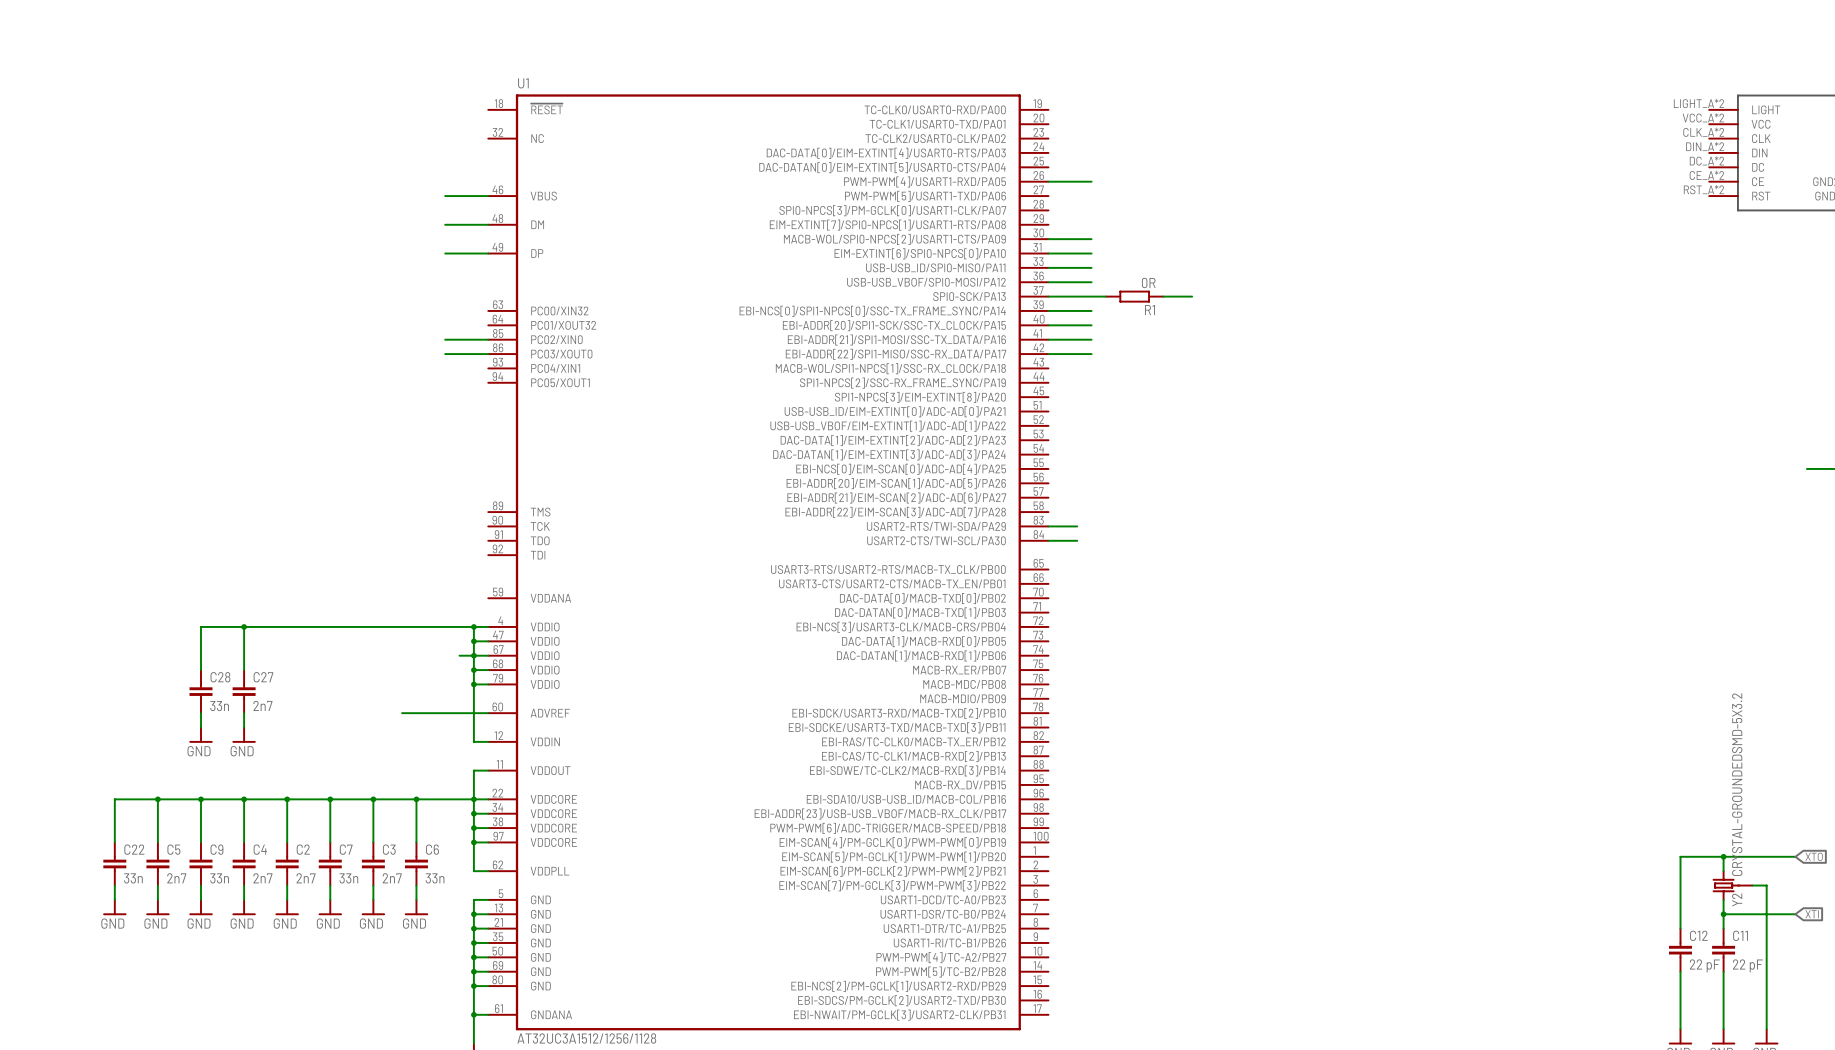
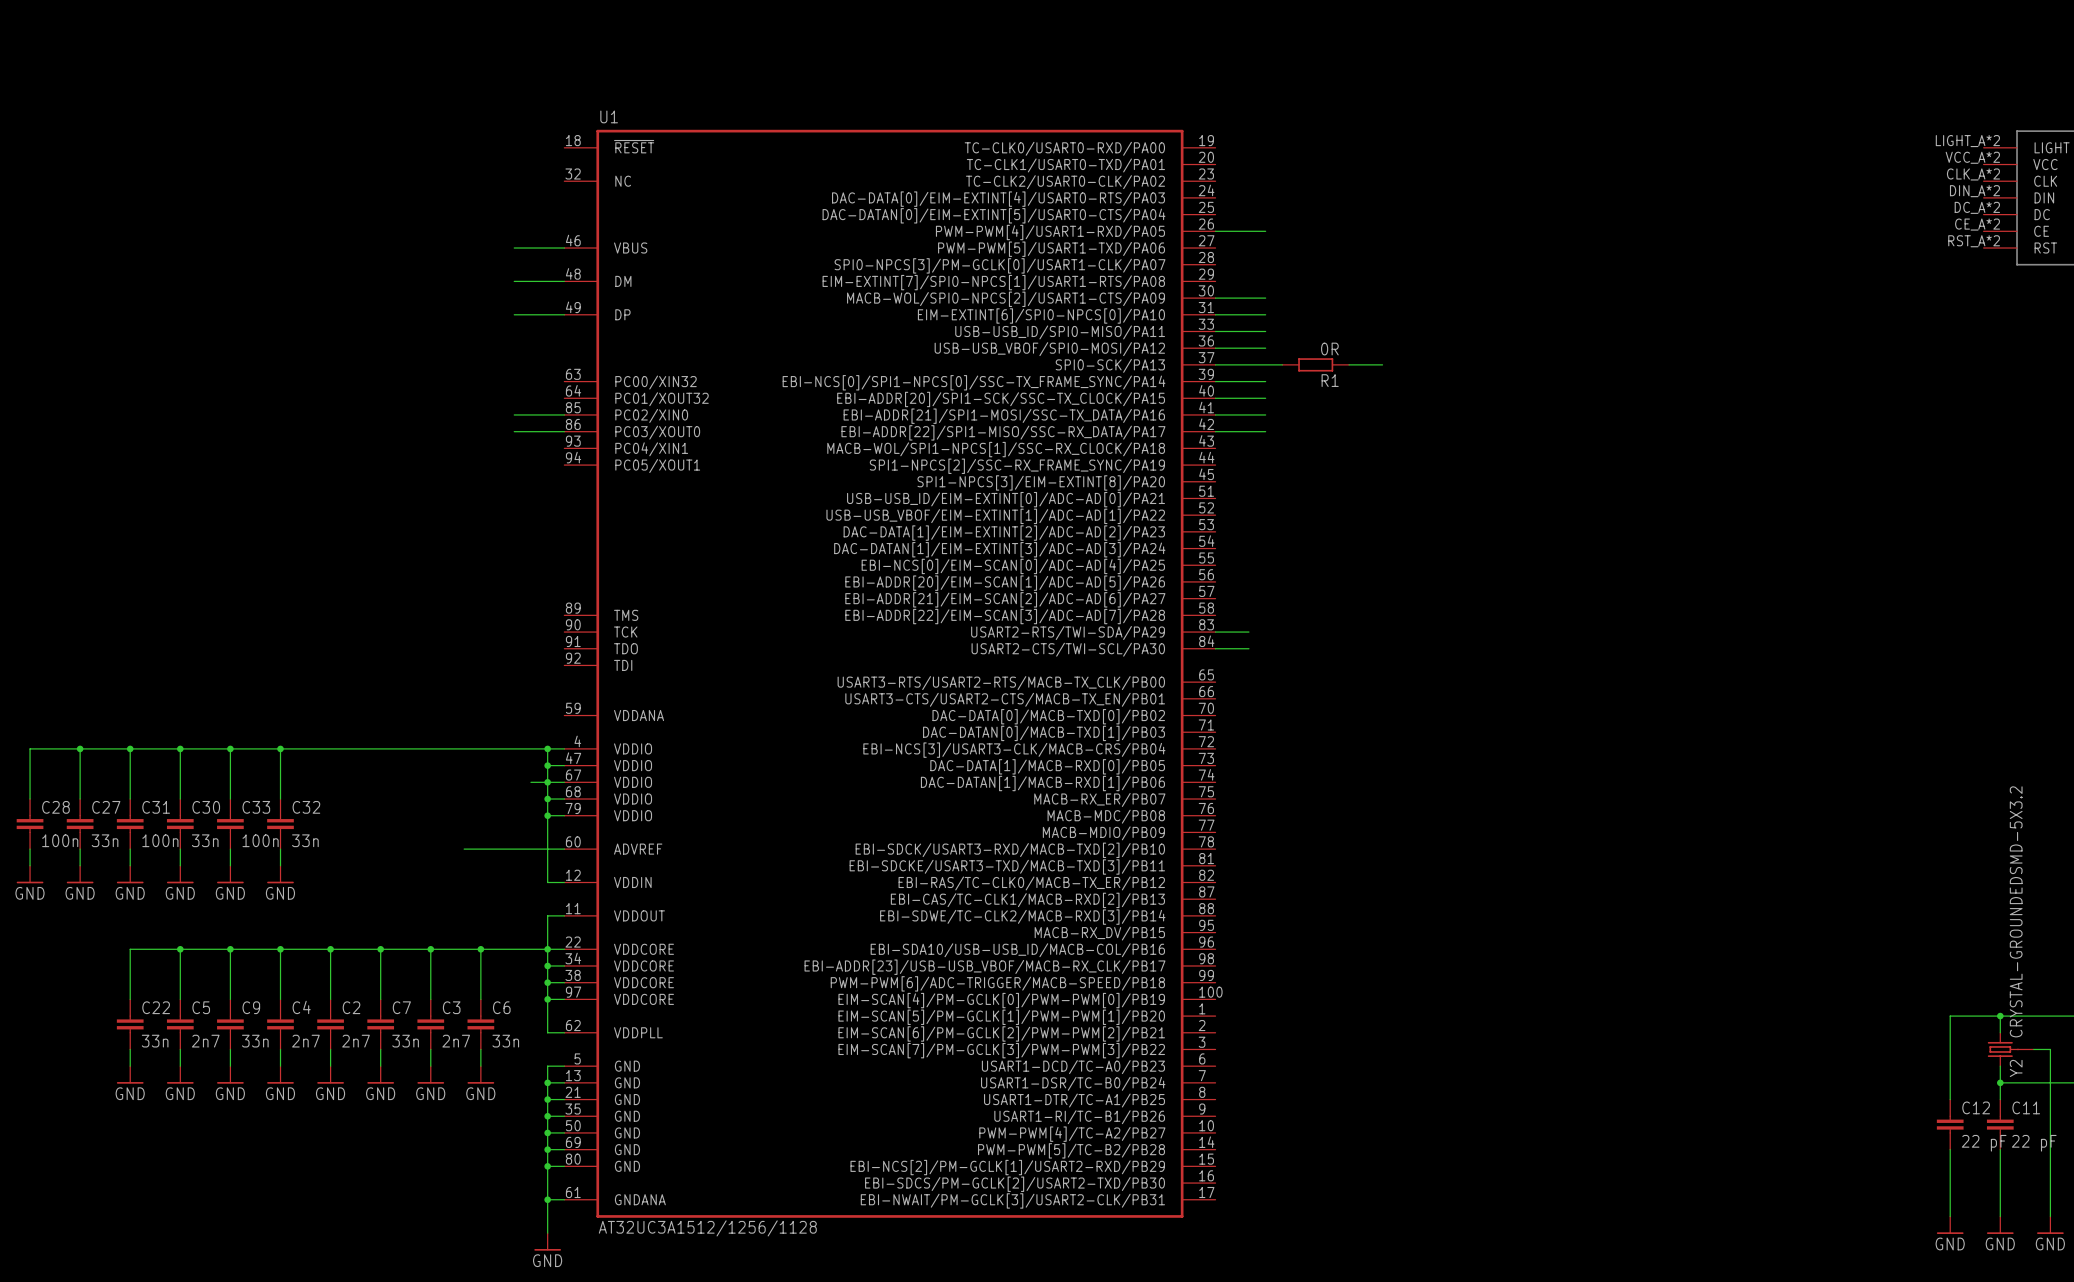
wire: none -> (80, 748) (80, 799)
junction: none -> (80, 748)
wire: none -> (130, 748) (130, 799)
junction: none -> (130, 748)
wire: none -> (180, 748) (180, 799)
junction: none -> (180, 748)
wire: none -> (230, 748) (30, 748) (30, 799)
junction: none -> (230, 748)
C28 name: C28 (220, 677) -> C33 (256, 807)
C27 name: C27 (263, 677) -> C32 (306, 807)
C28: none -> 100n (30, 824)
C27: none -> 33n (80, 824)
C31: none -> 100n (130, 824)
C30: none -> 33n (180, 824)
C27 value: 2n7 (262, 705) -> 33n (305, 840)
C28 value: 33n (219, 706) -> 100n (260, 840)
wire: none -> (30, 849) (30, 865)
wire: none -> (80, 849) (80, 865)
wire: none -> (130, 849) (130, 865)
wire: none -> (180, 849) (180, 865)
power symbol: none -> GND (30, 874)
power symbol: none -> GND (80, 874)
power symbol: none -> GND (130, 874)
power symbol: none -> GND (180, 874)

